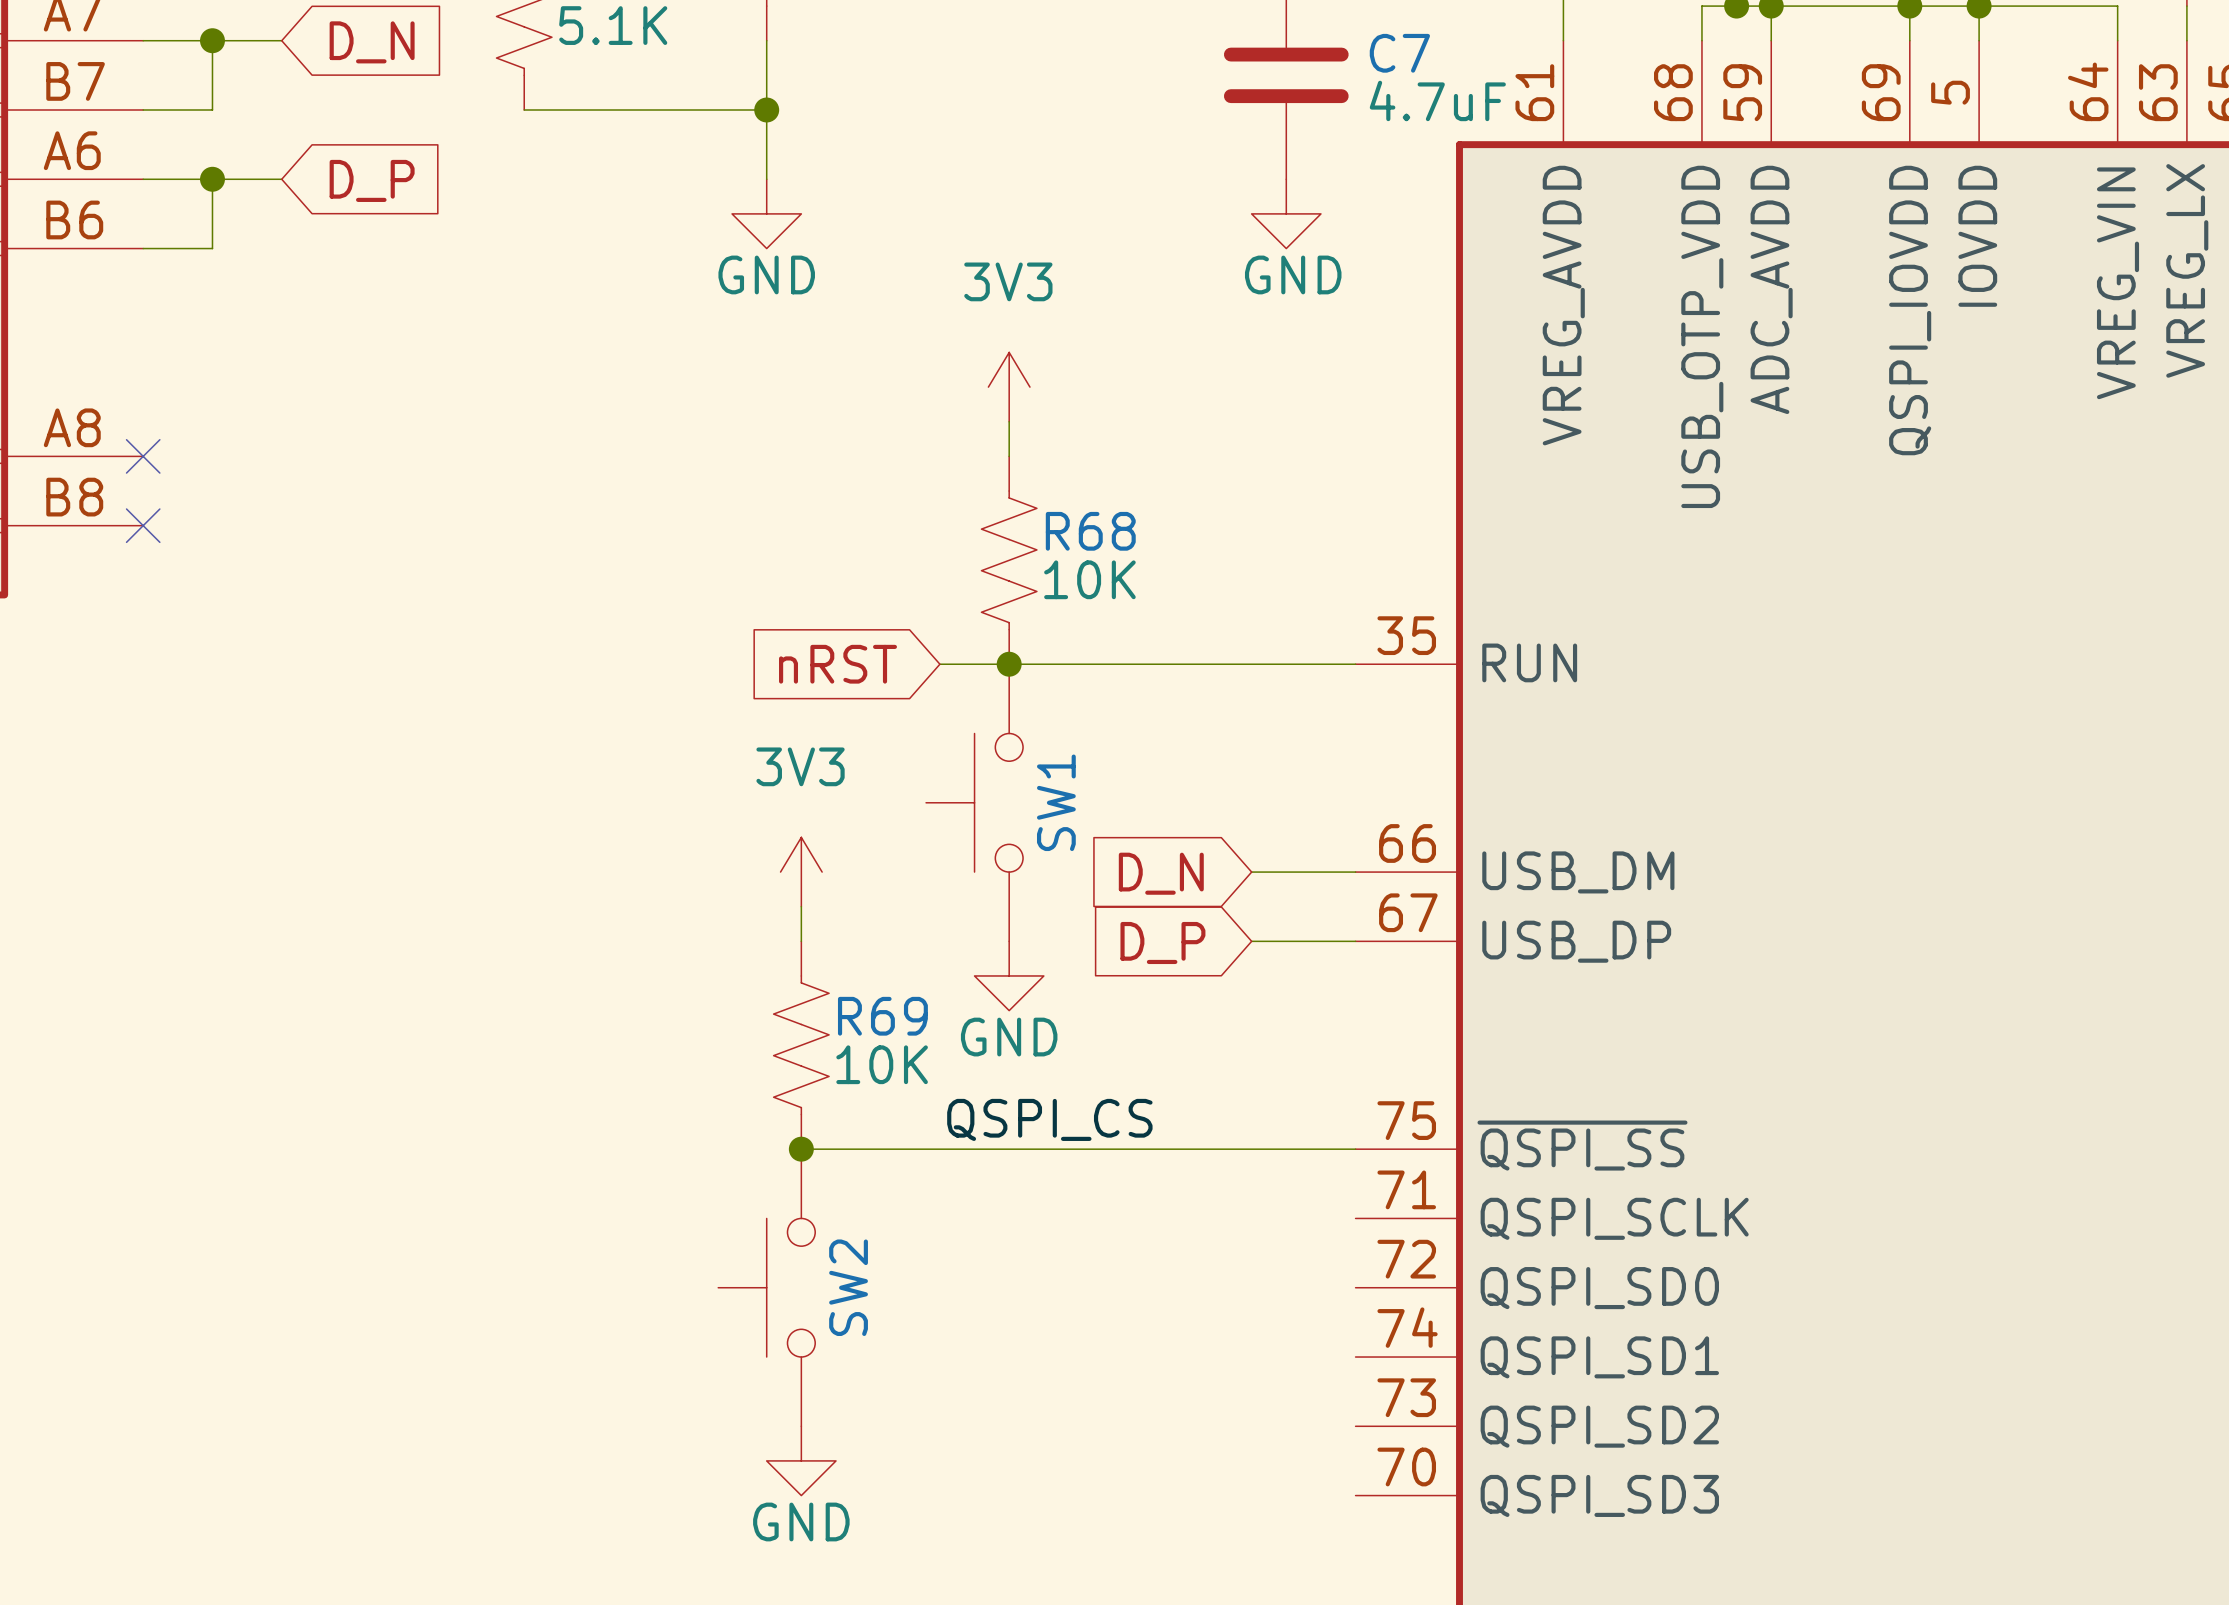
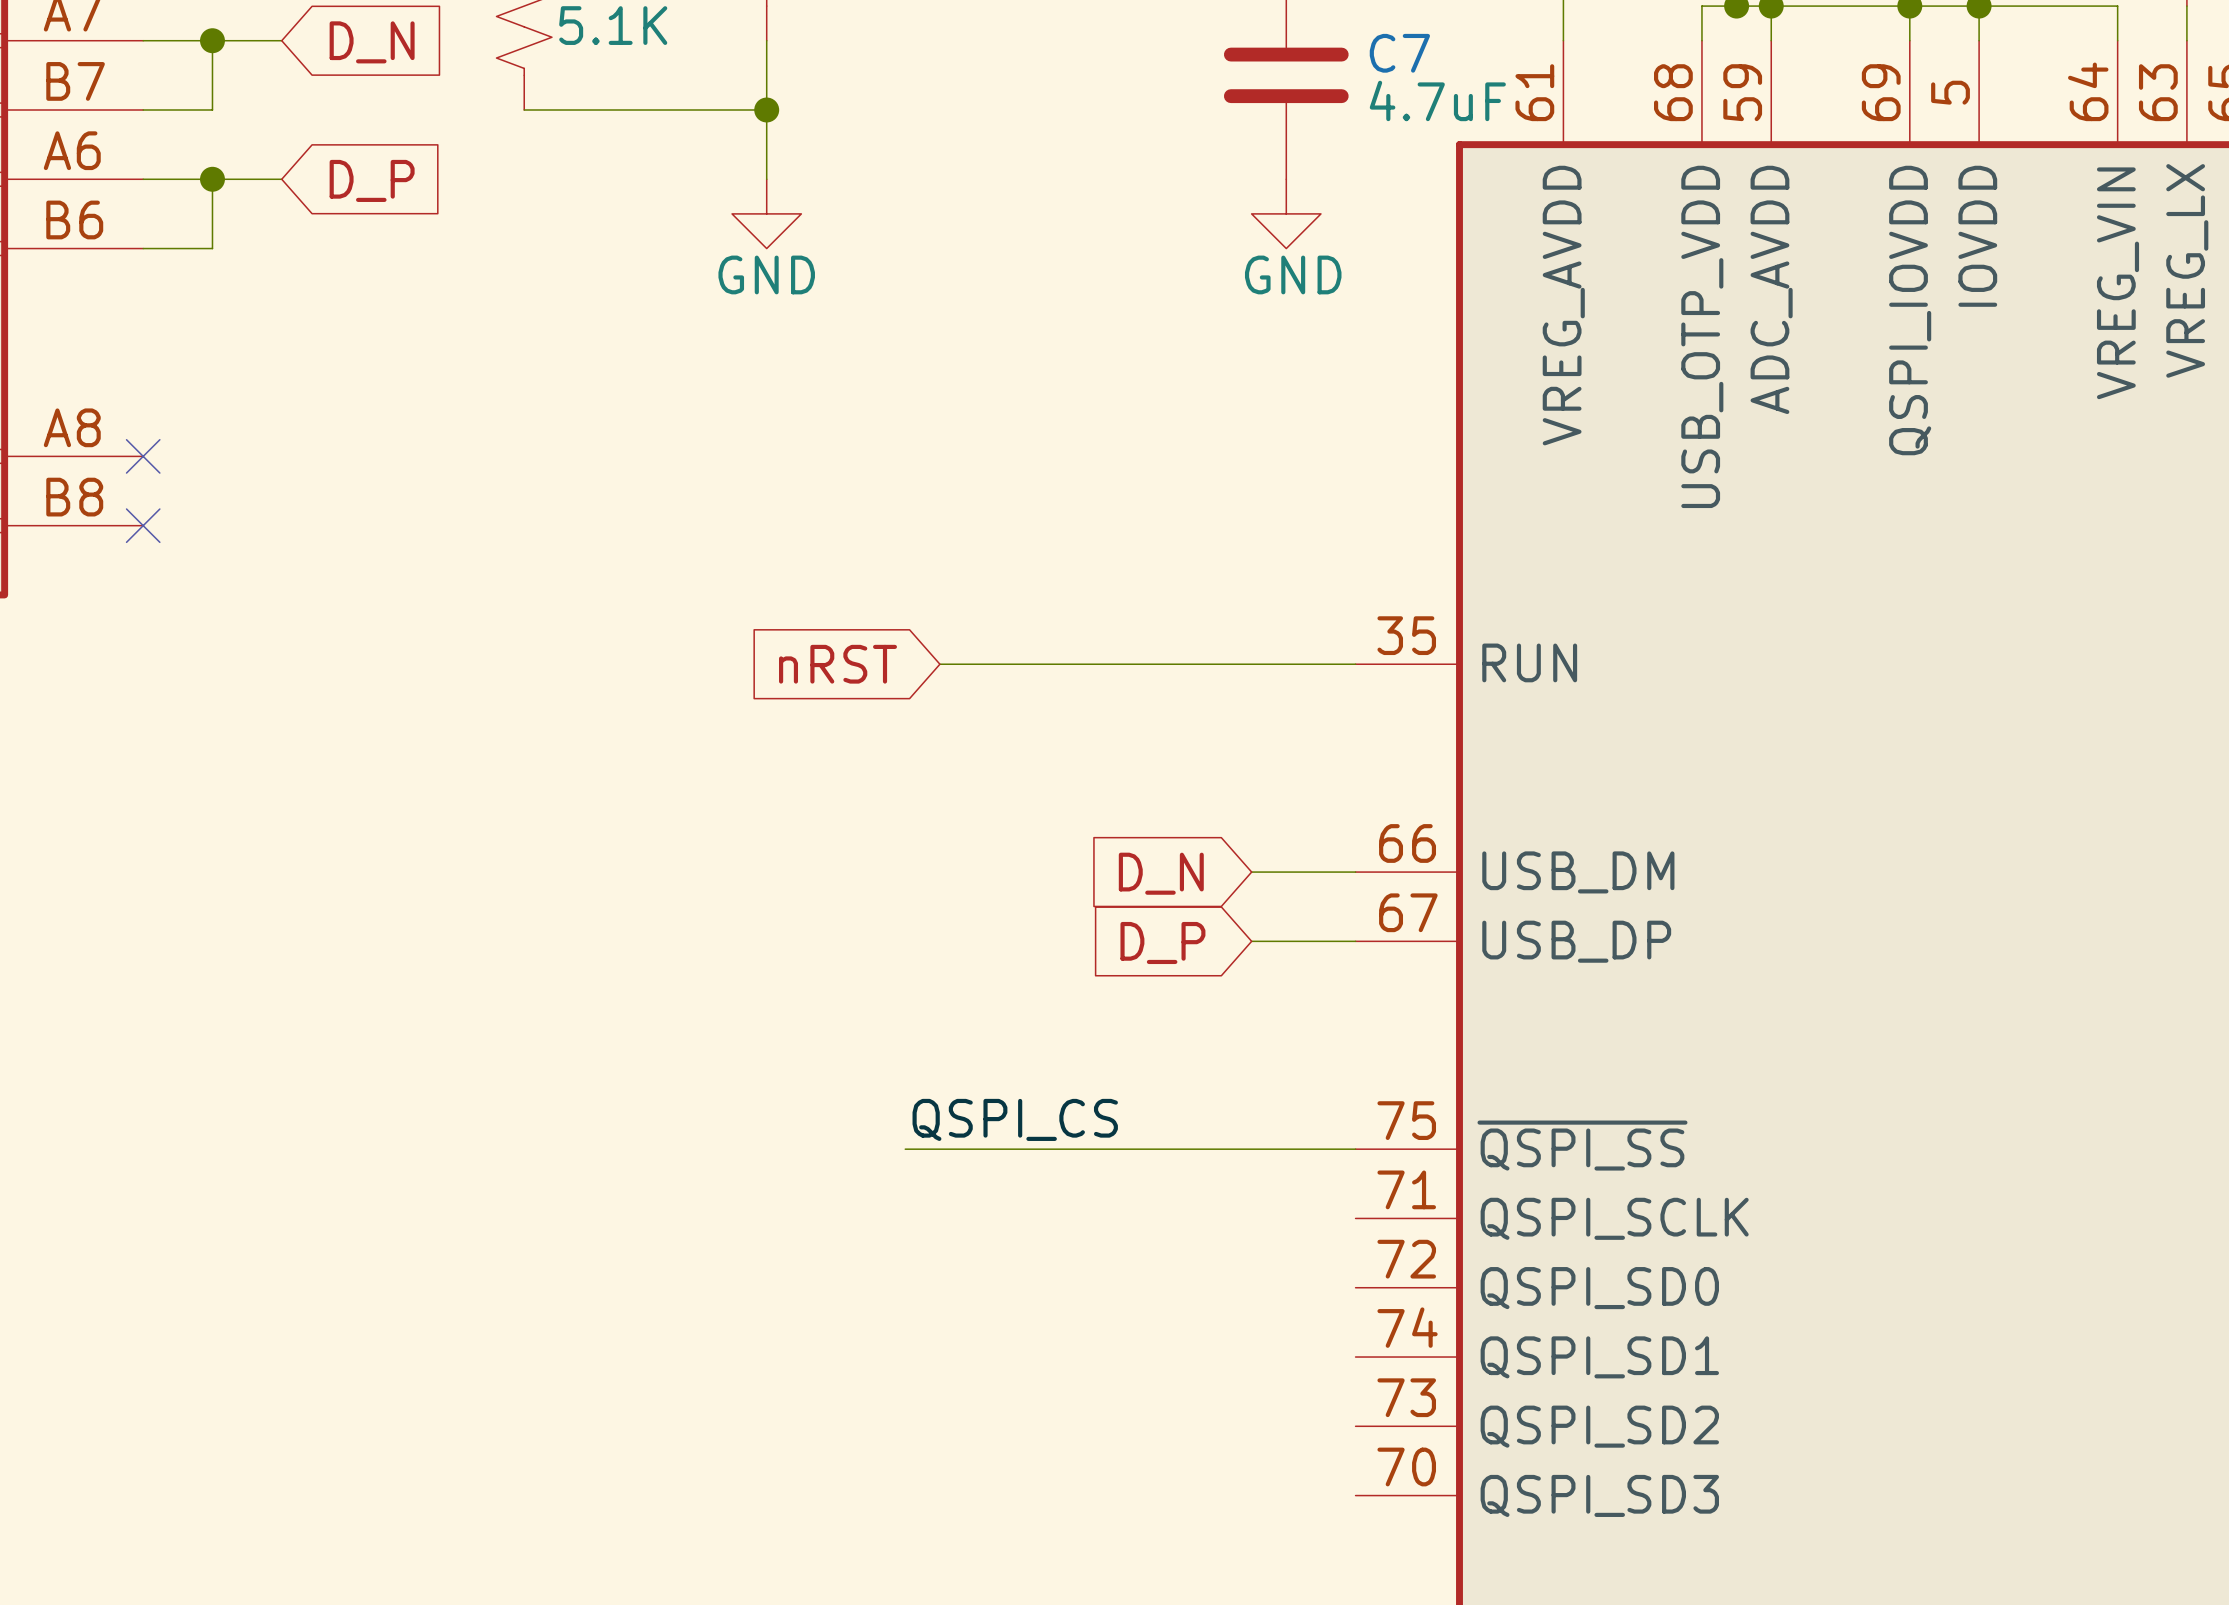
power symbol: 3V3 (1009, 387) -> none
wire: (1009, 421) (1009, 456) -> none
R68: 10K (1009, 560) -> none
junction: (1009, 664) -> none
SW1: (974, 802) -> none
power symbol: 3V3 (801, 872) -> none
wire: (801, 906) (801, 941) -> none
power symbol: GND (1009, 975) -> none
R69: 10K (801, 1045) -> none
label position: QSPI_CS (1049, 1119) -> QSPI_CS (1015, 1119)
wire: (801, 1149) (905, 1149) -> none
junction: (801, 1149) -> none
SW2: (766, 1287) -> none
power symbol: GND (801, 1460) -> none

